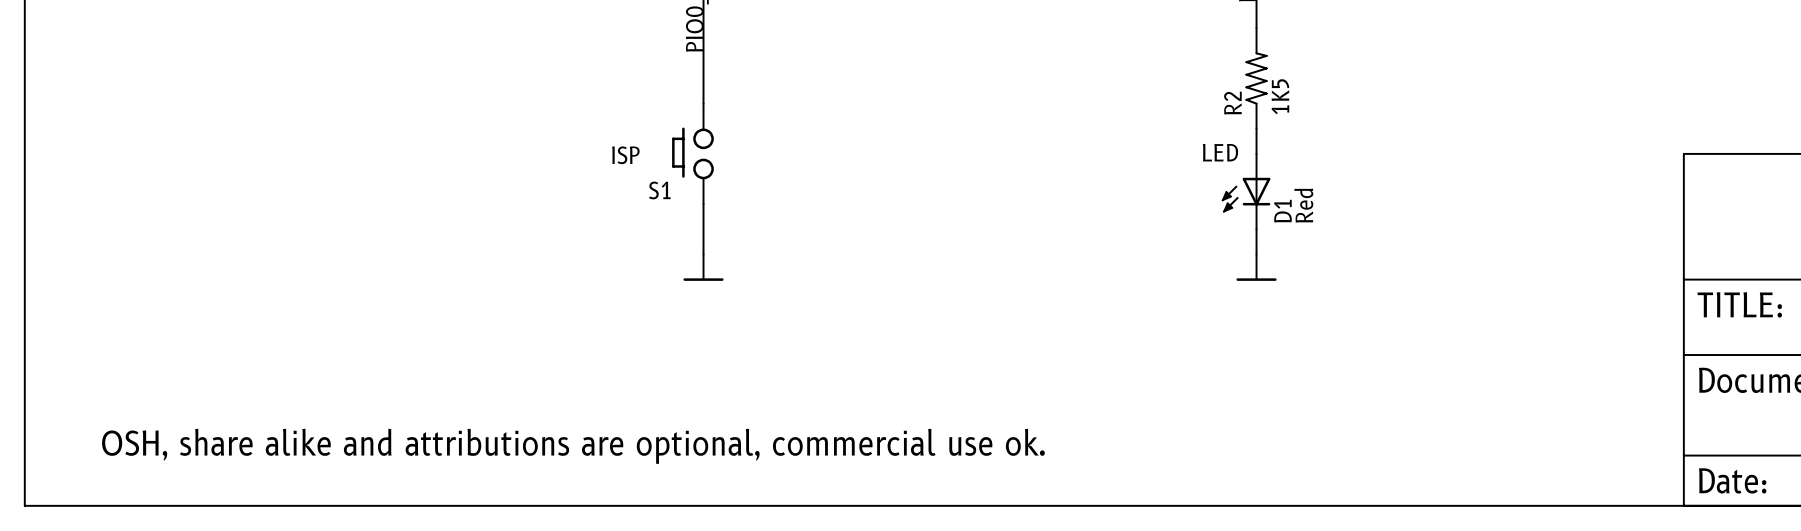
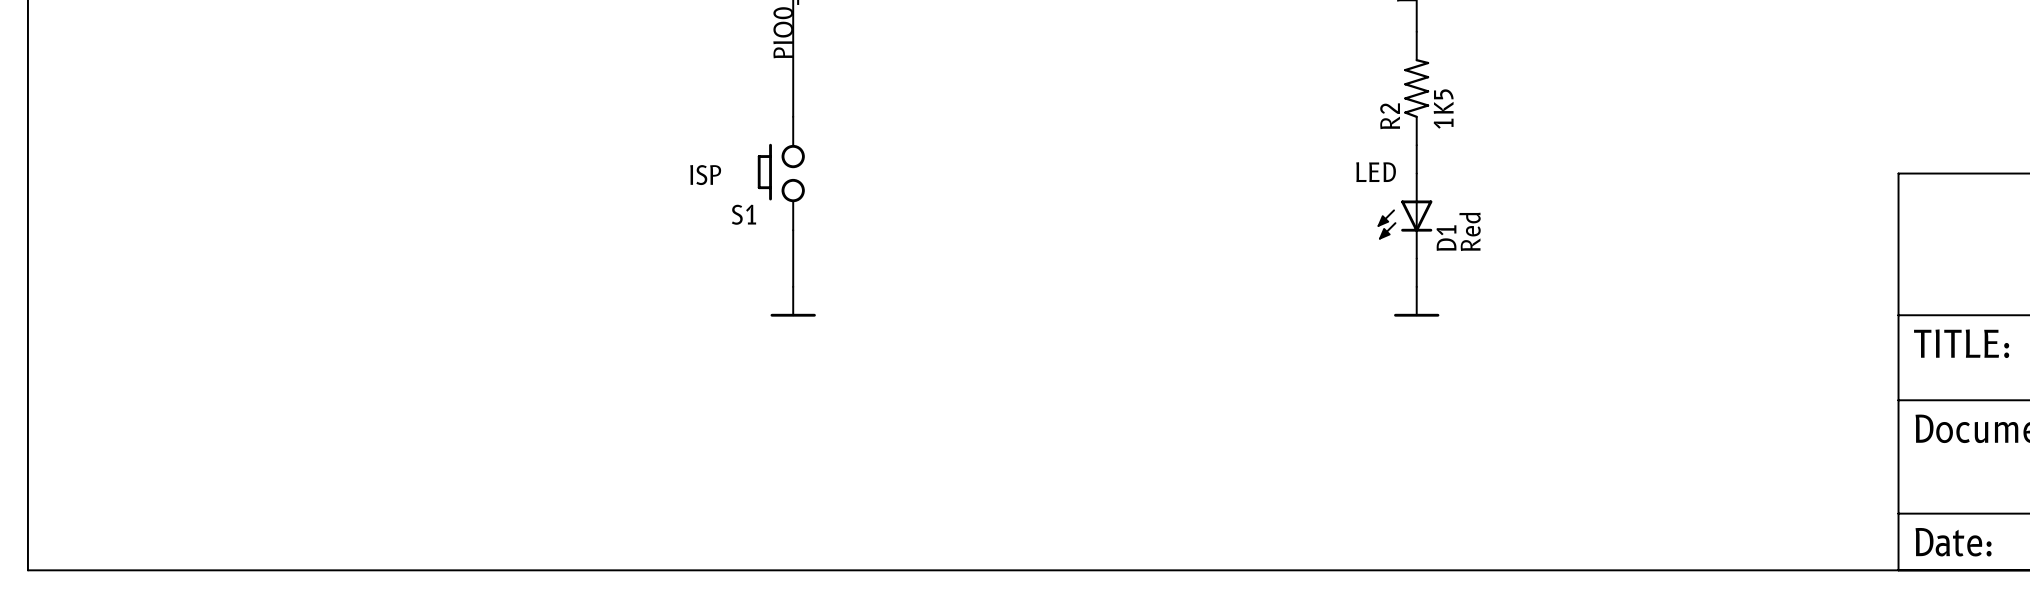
text: OSH, share alike and attributions are optional, commercial use ok. (573, 446) -> none

